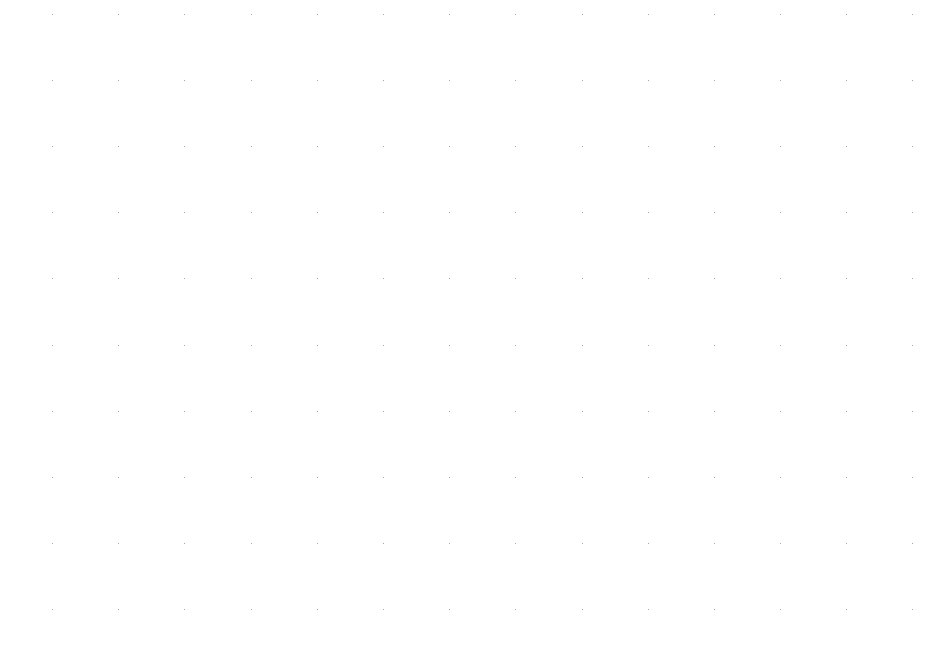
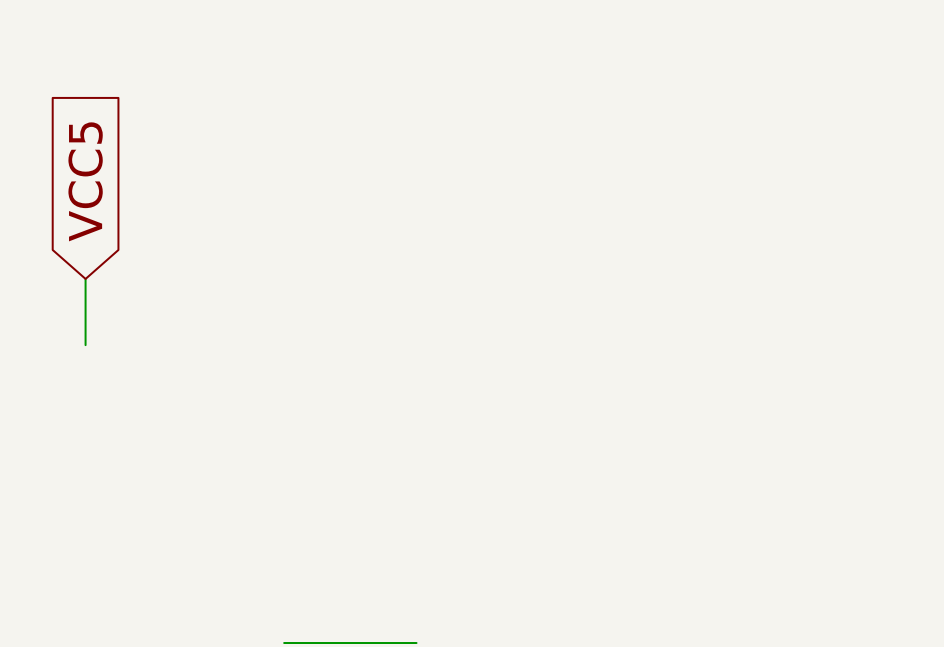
global label: none -> VCC5 (85, 181)
wire: none -> (85, 278) (85, 345)
wire: none -> (284, 643) (416, 643)

